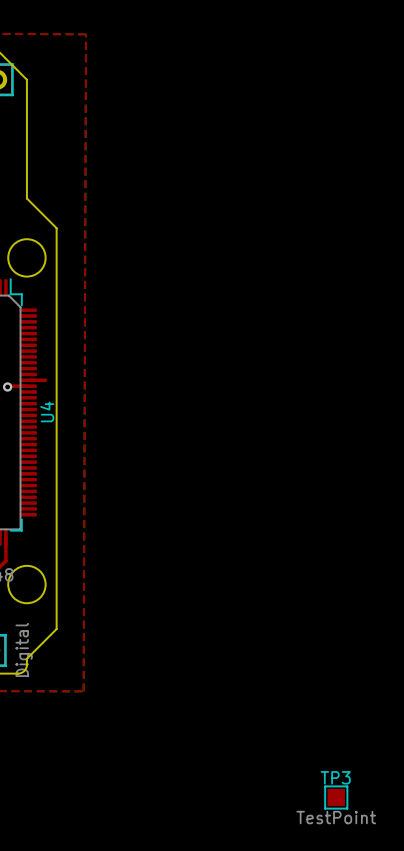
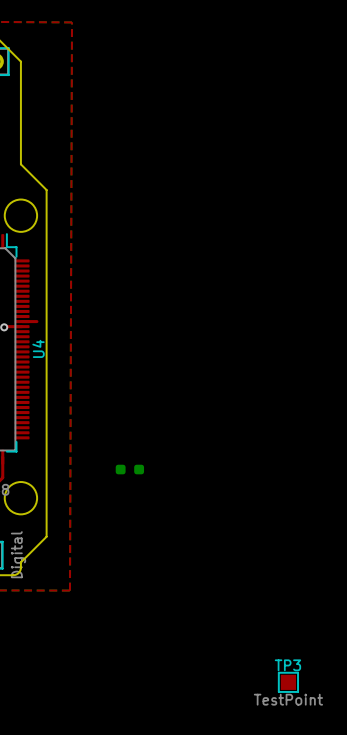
part: none -> (129, 469)

